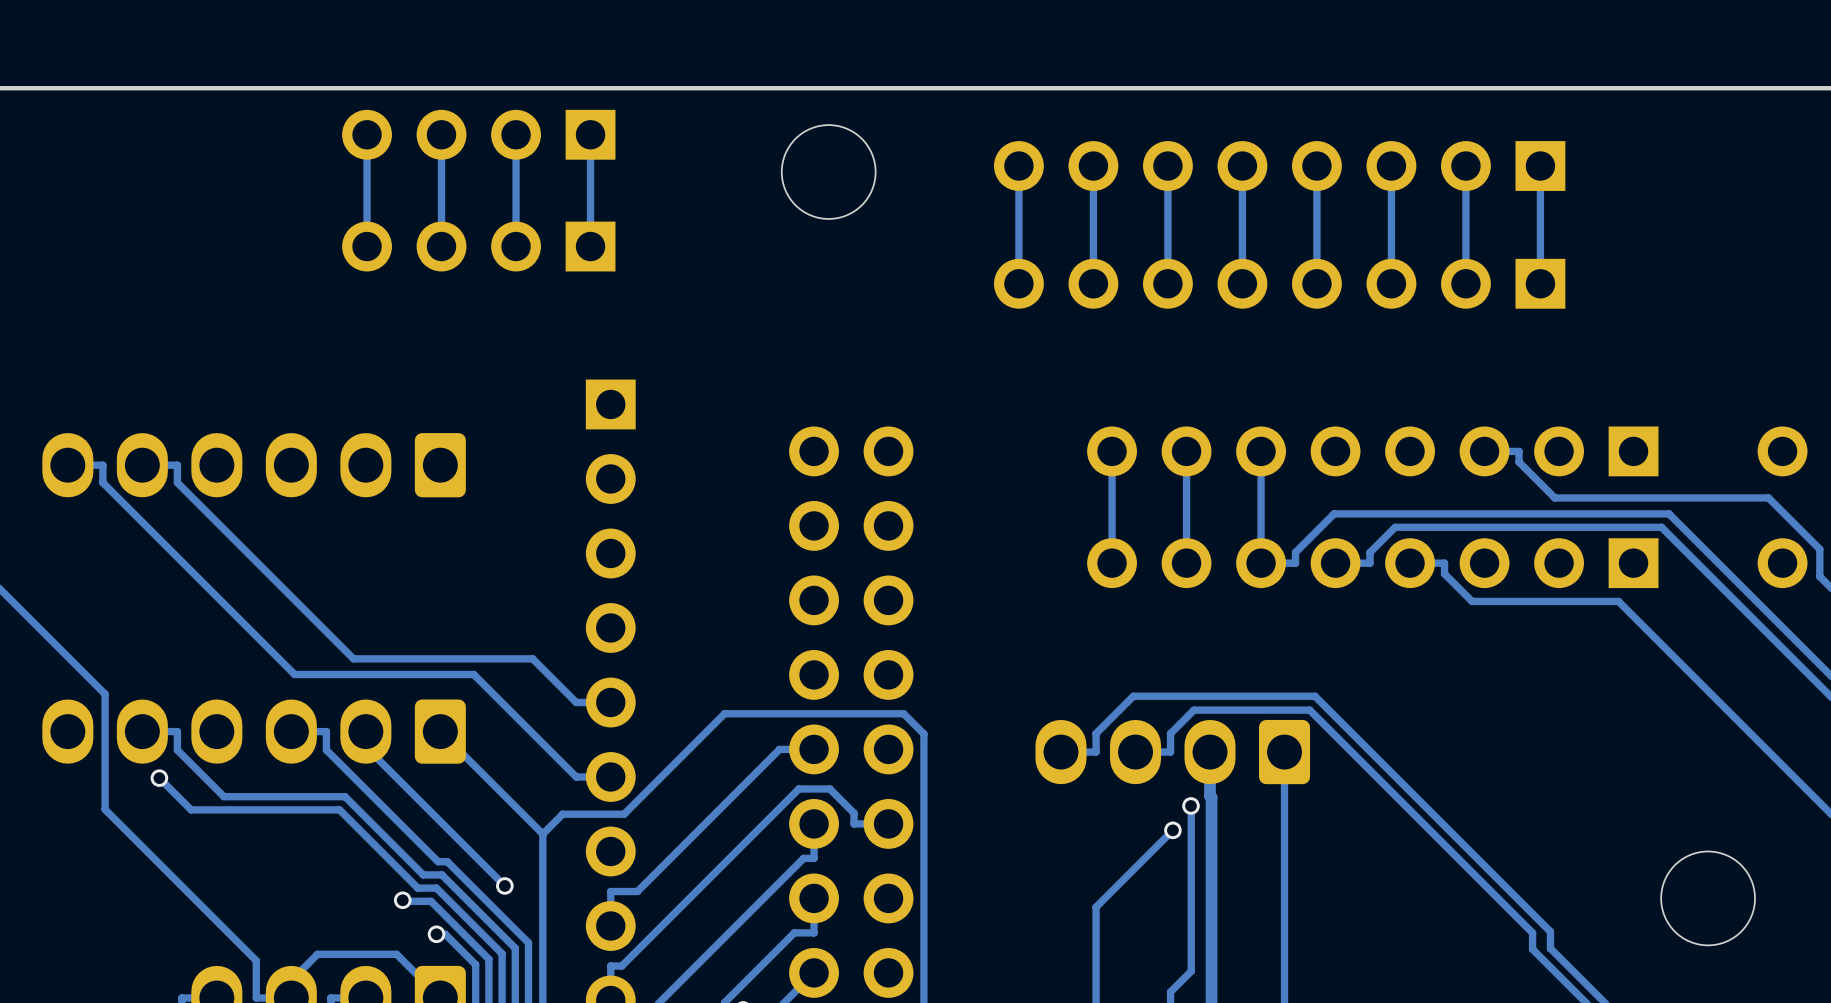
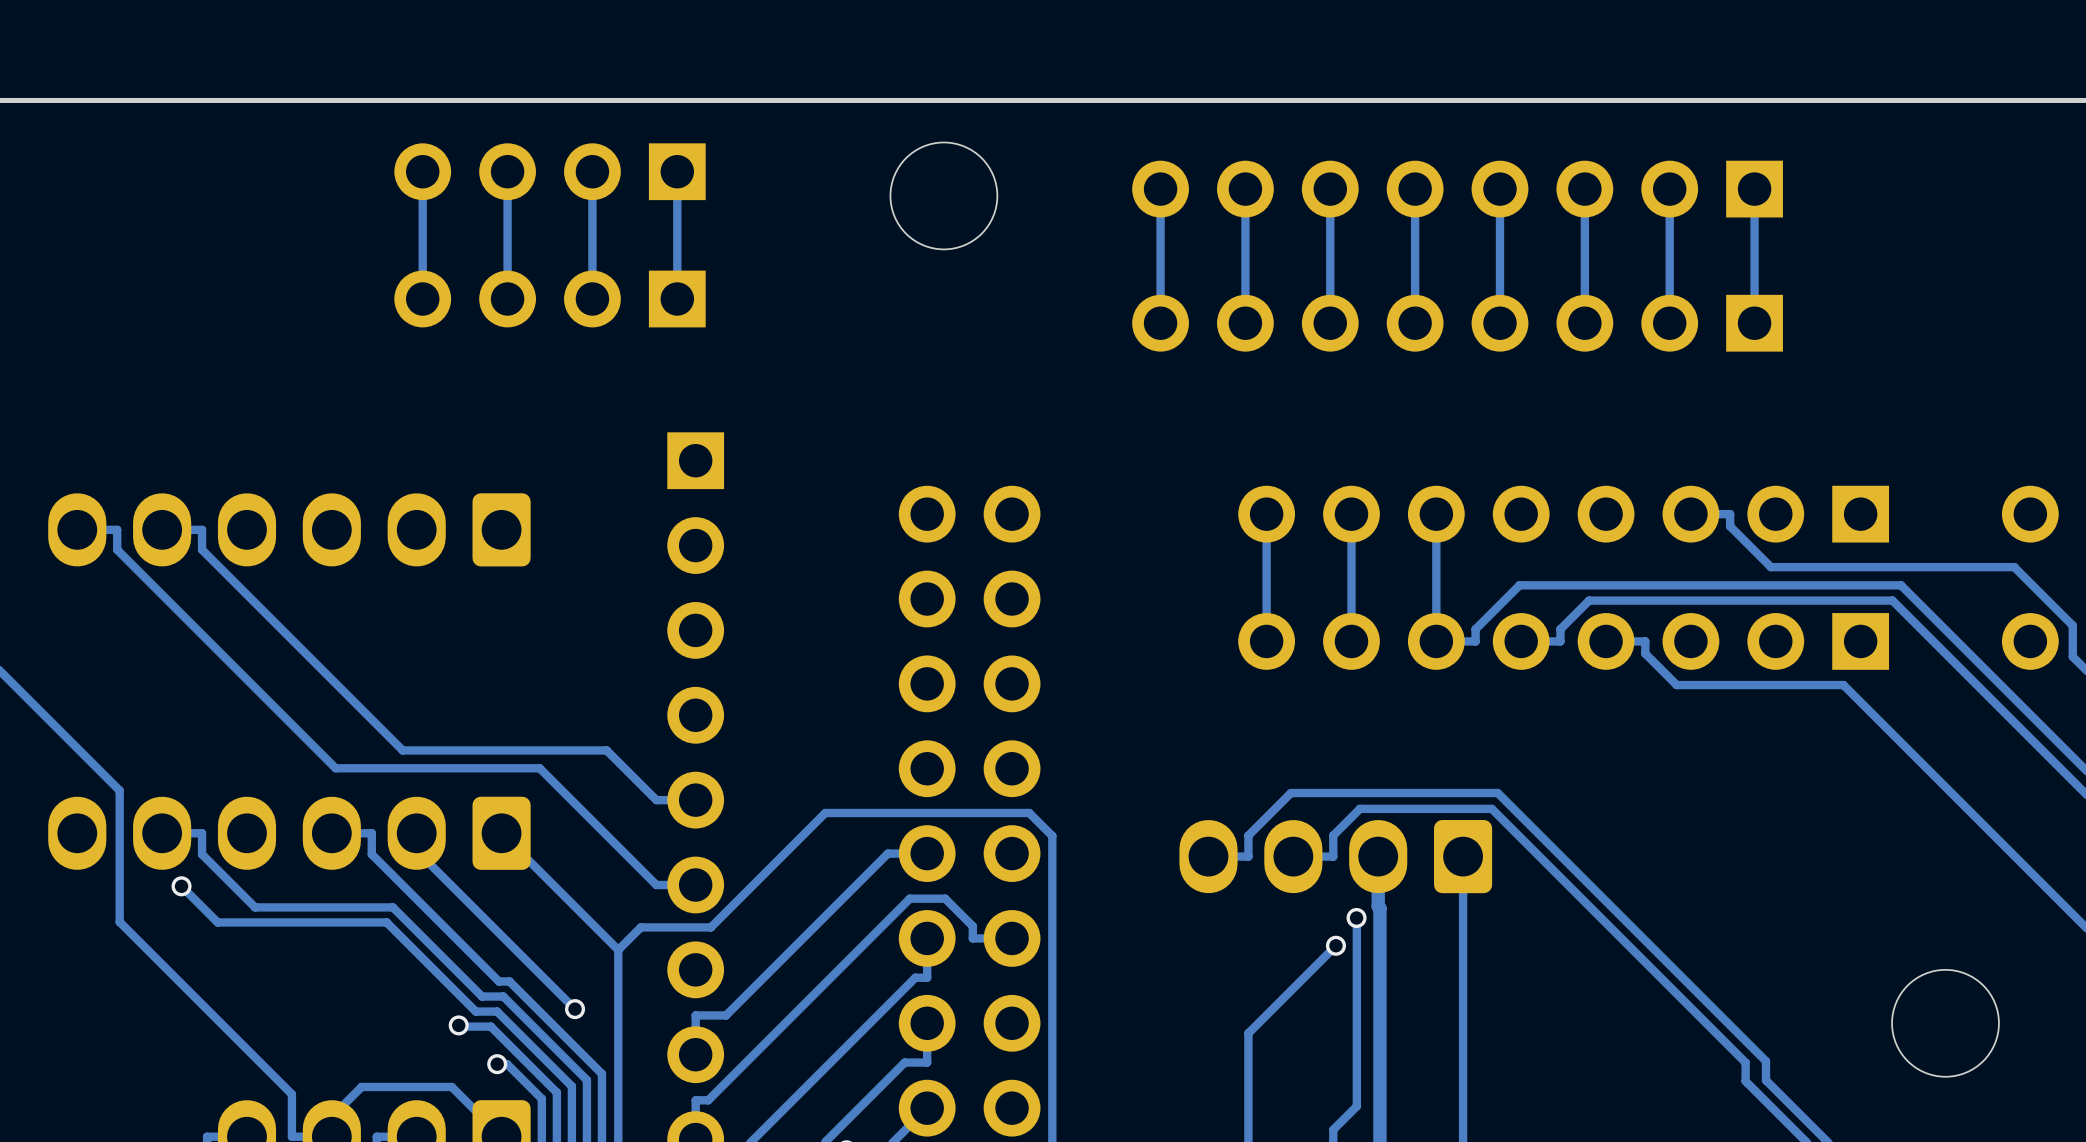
track: (367, 134) (367, 246) -> (422, 171) (422, 299)
track: (441, 134) (441, 246) -> (507, 171) (507, 299)
part position: (478, 134) -> (550, 171)
track: (516, 134) (516, 246) -> (592, 171) (592, 299)
track: (590, 134) (590, 246) -> (677, 171) (677, 299)
part position: (478, 246) -> (550, 299)

